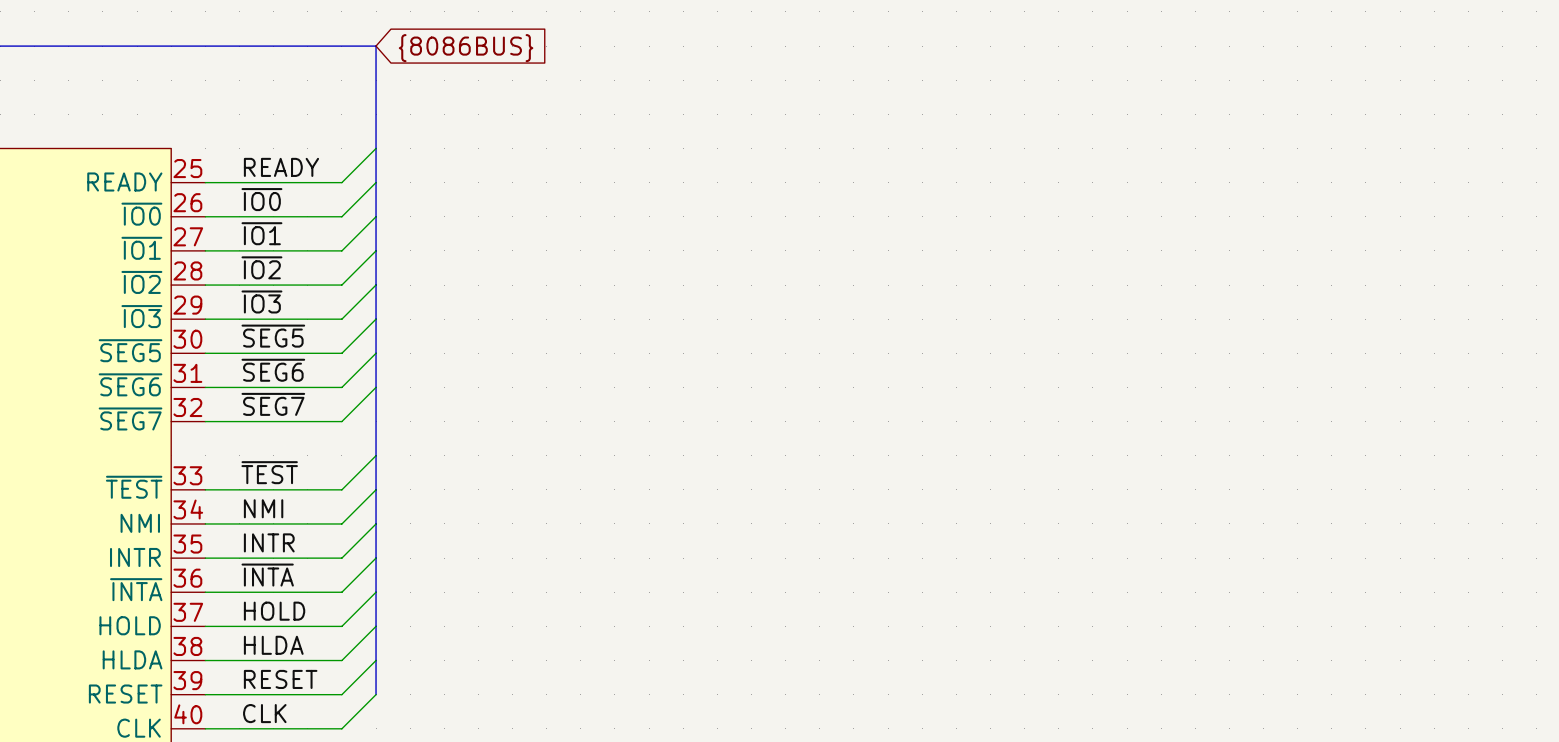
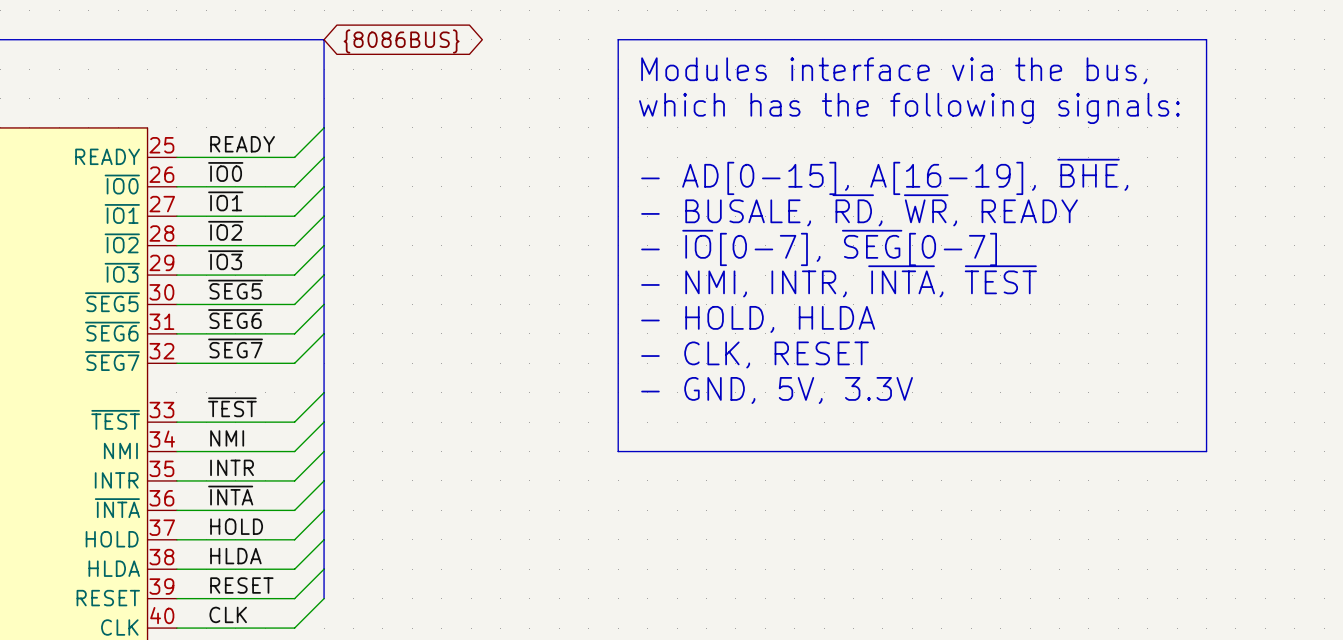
line: none -> (618, 39) (1206, 39) (1206, 451) (618, 451) (618, 39)
global label shape: input (466, 48) -> bidirectional (401, 41)
text: none -> Modules interface via the bus, (894, 70)
text: none -> which has the following signals: (909, 108)
text: none -> - AD[0-15], A[16-19], ~{BHE}, (884, 176)
text: none -> - BUSALE, ~{RD}, ~{WR}, READY (859, 210)
text: none -> - ~{IO}[0-7], ~{SEG}[0-7] (819, 247)
text: none -> - NMI, INTR, ~{INTA}, ~{TEST} (839, 281)
text: none -> - HOLD, HLDA (758, 319)
text: none -> - CLK, RESET (754, 354)
text: none -> - GND, 5V, 3.3V (777, 390)

